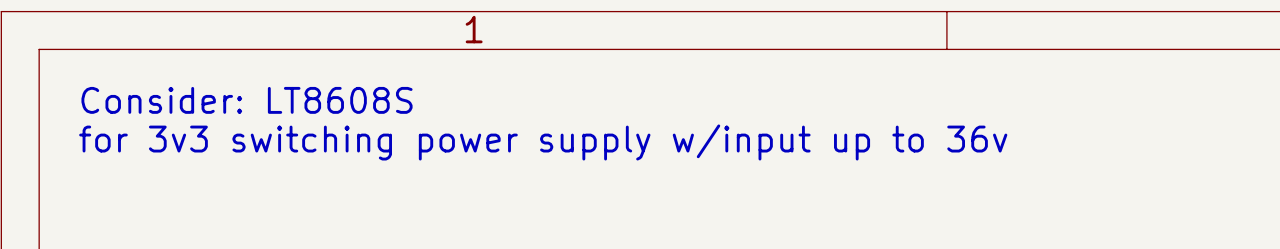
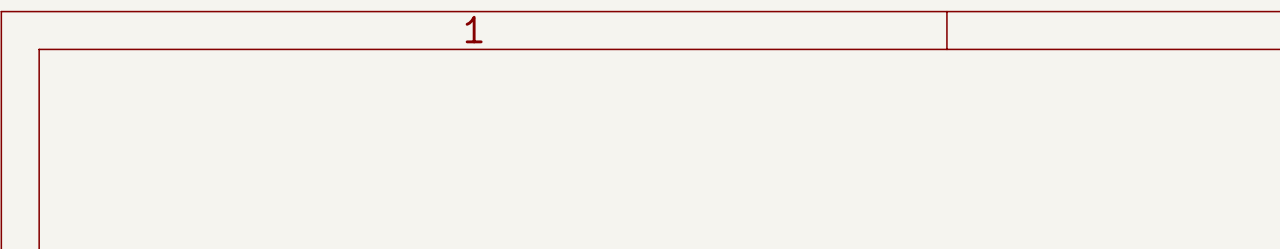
text: Consider: LT8608S (247, 100) -> none
text: for 3v3 switching power supply w/input up to 36v (543, 142) -> none

